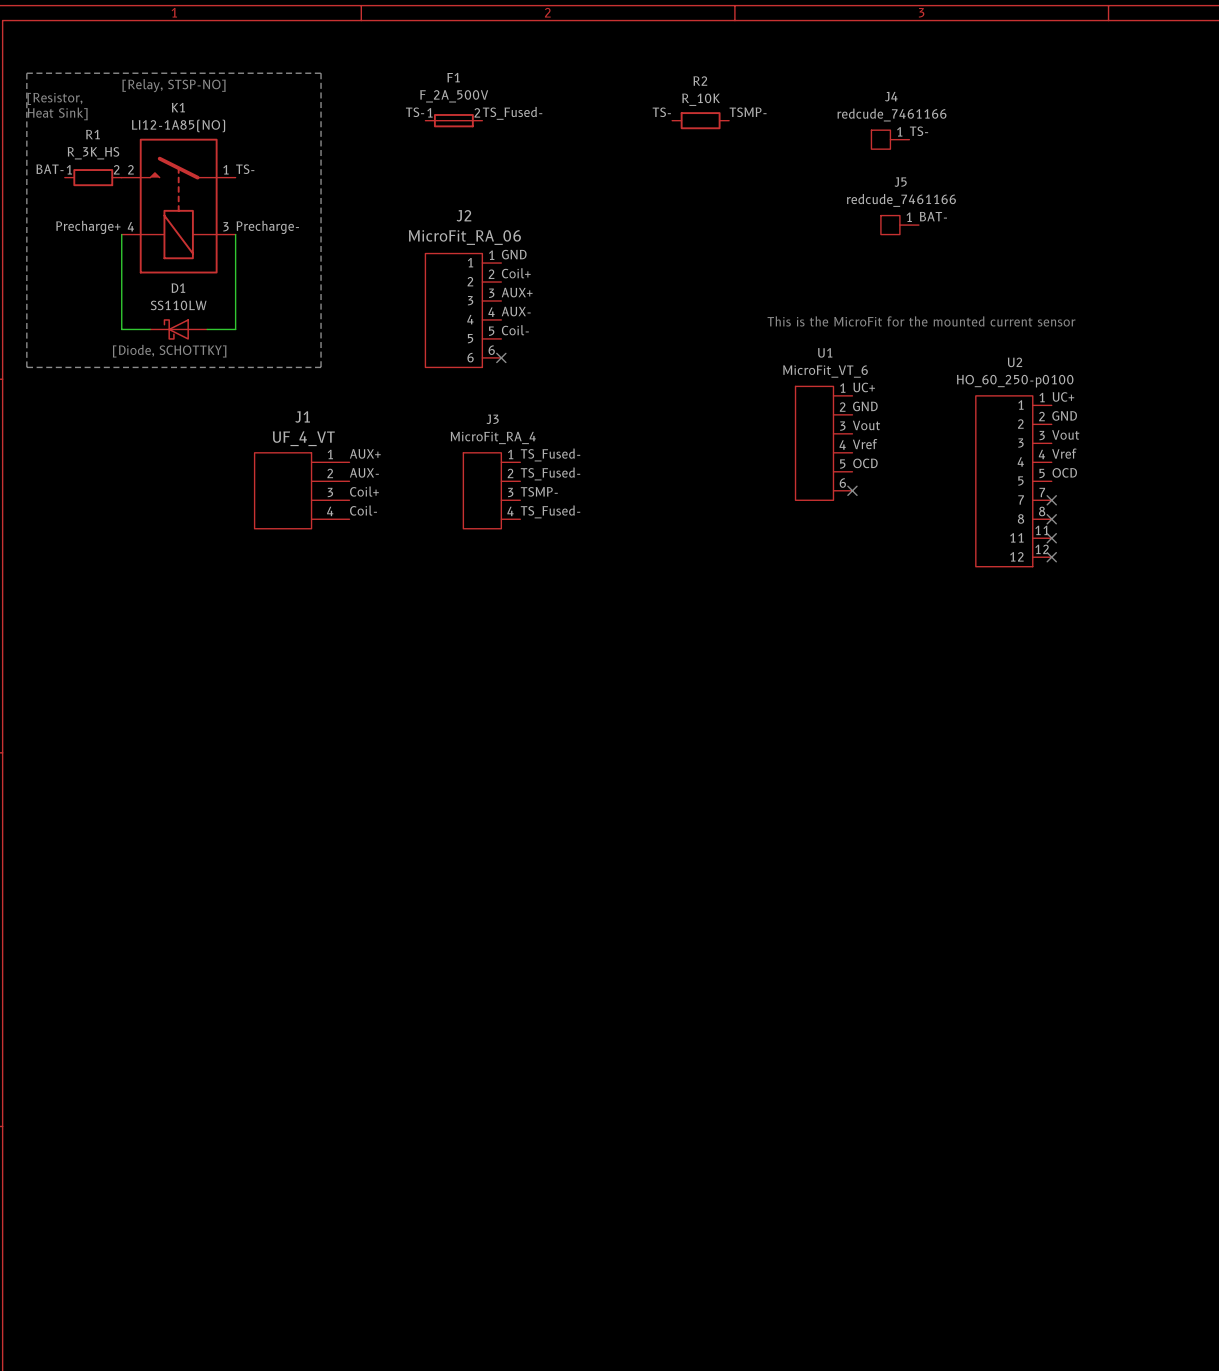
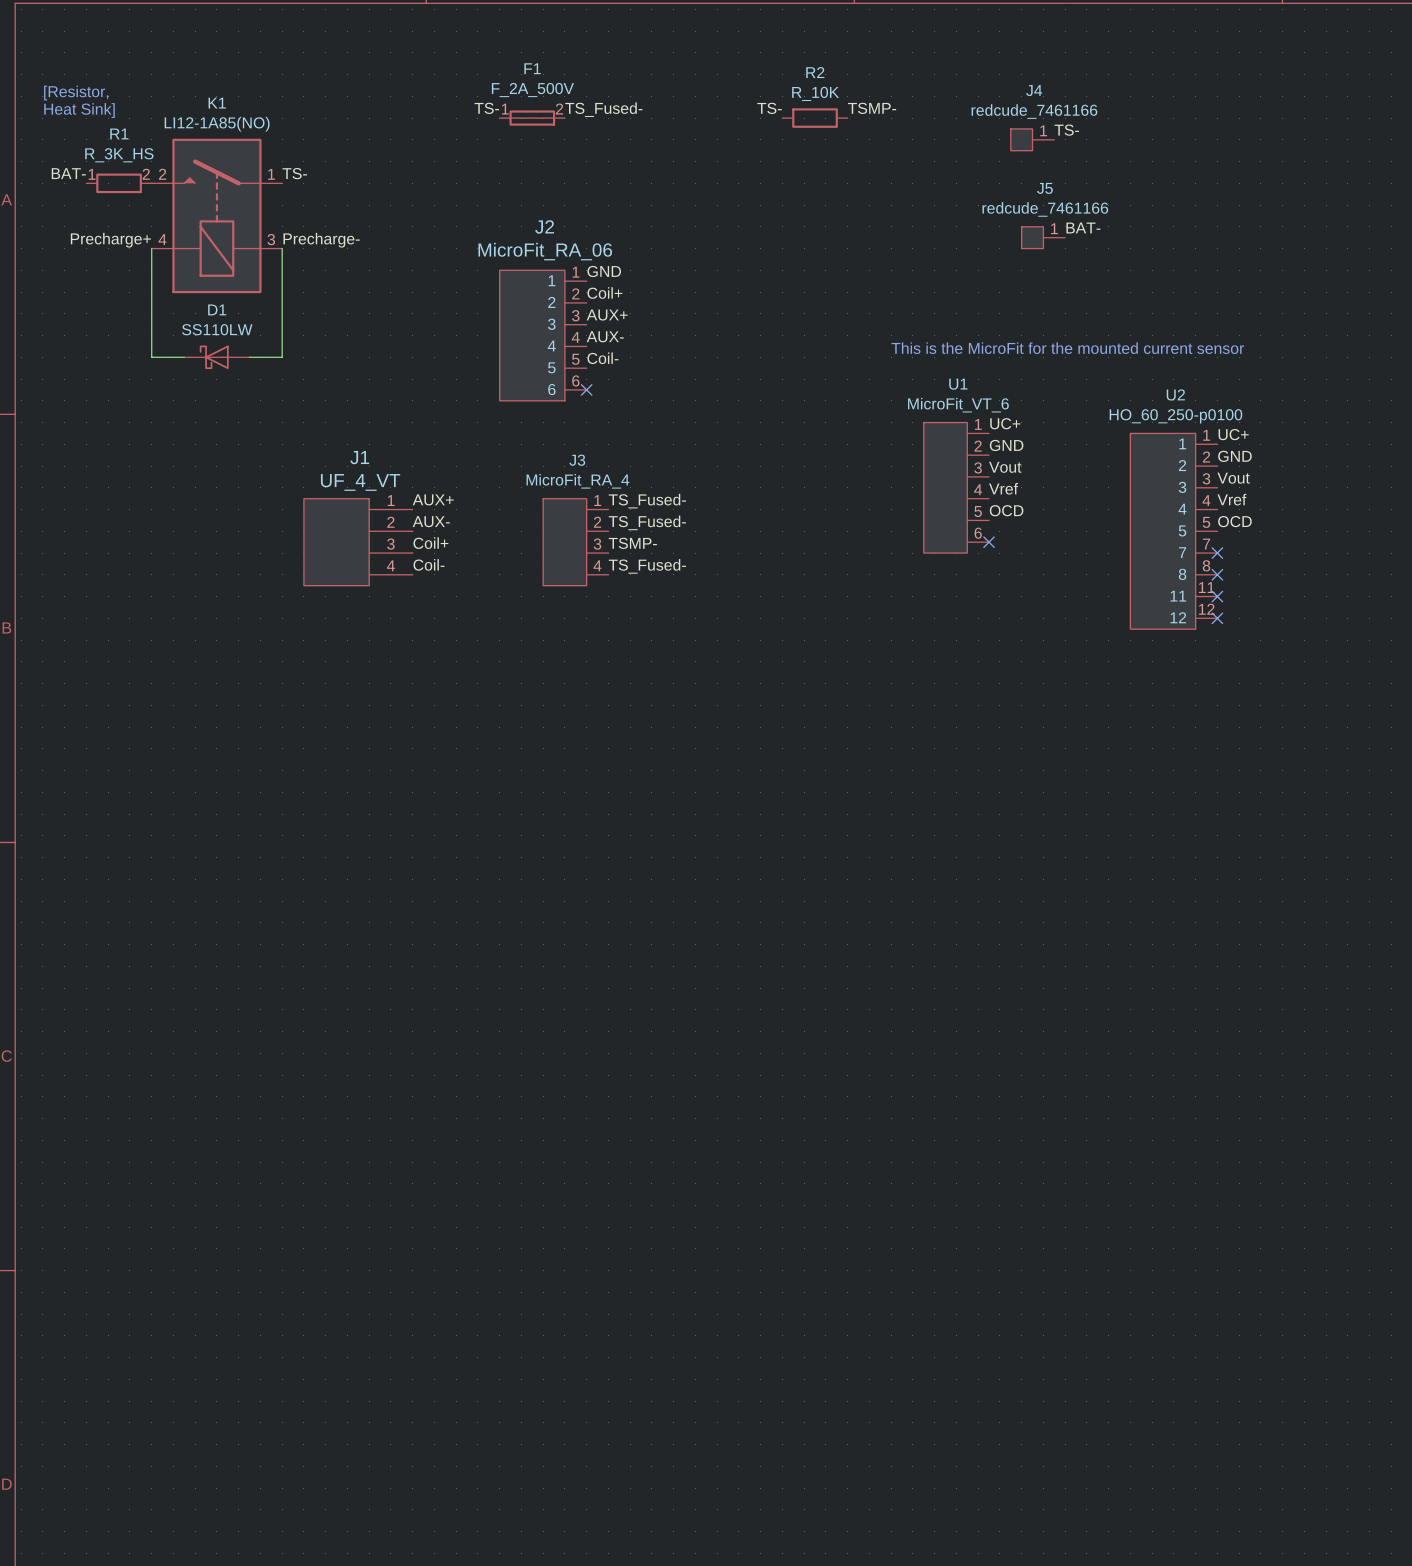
line: (26, 73) (26, 367) (321, 367) (321, 73) (26, 73) -> none
text: [Relay, STSP-NO] (174, 85) -> none
text: [Diode, SCHOTTKY] (169, 351) -> none

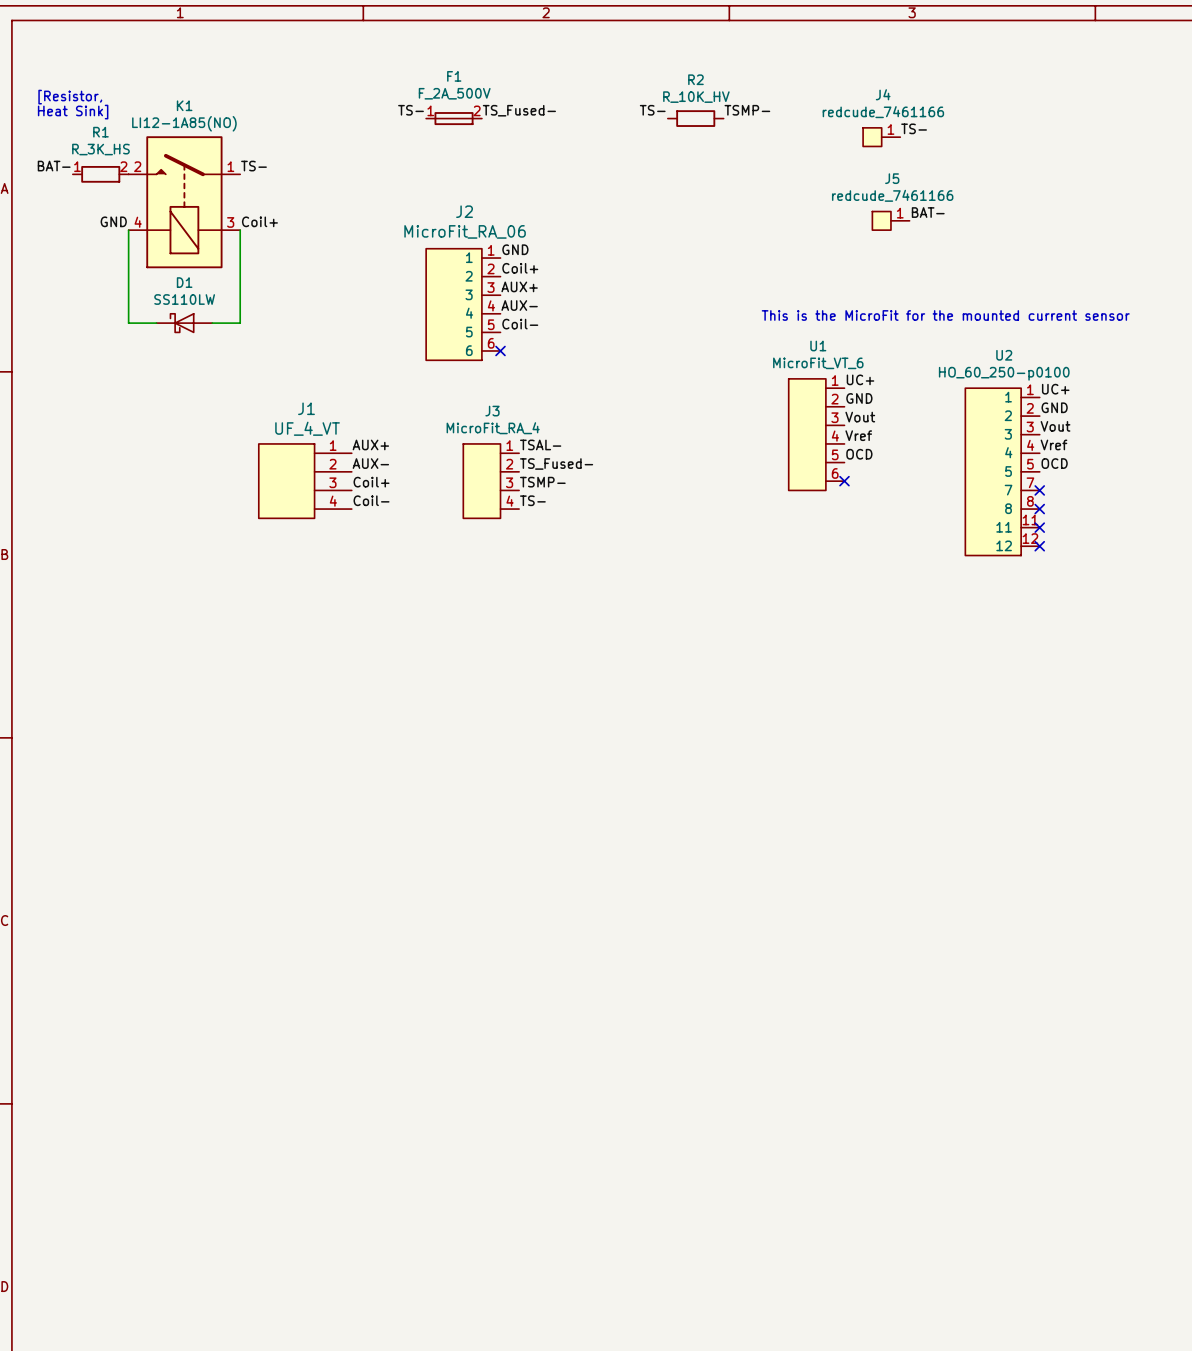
R2 value: R_10K (815, 93) -> R_10K_HV (696, 97)
label: Precharge+ (110, 240) -> GND (113, 221)
label: Precharge- (321, 240) -> Coil+ (259, 221)
label: TS_Fused- (647, 501) -> TSAL- (540, 444)
label: TS_Fused- (647, 566) -> TS- (532, 500)

